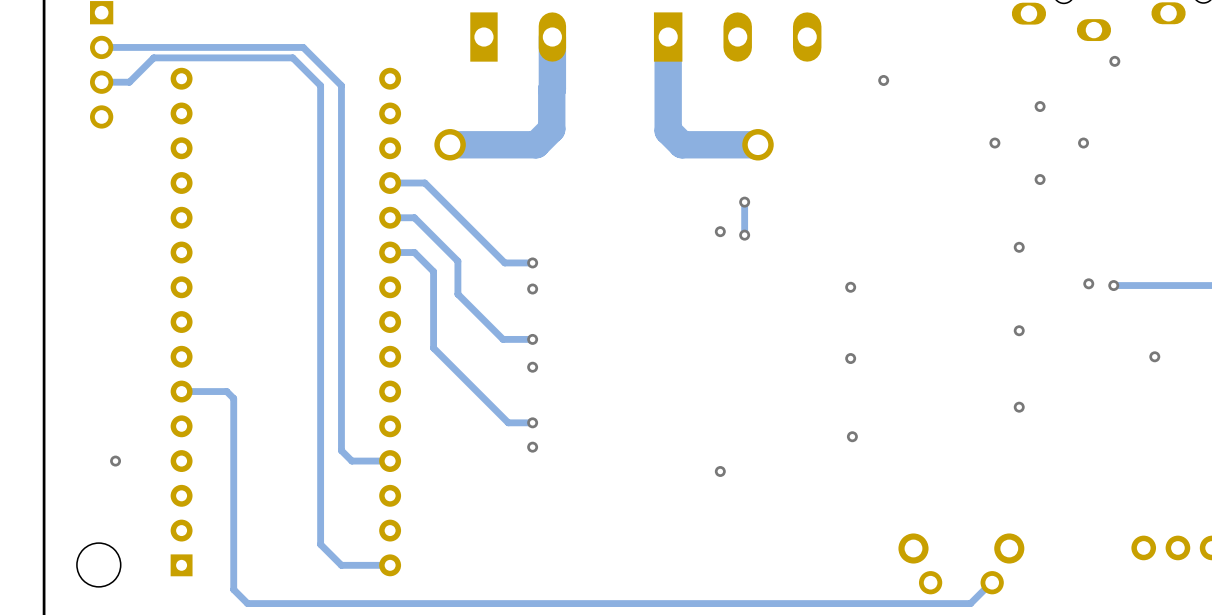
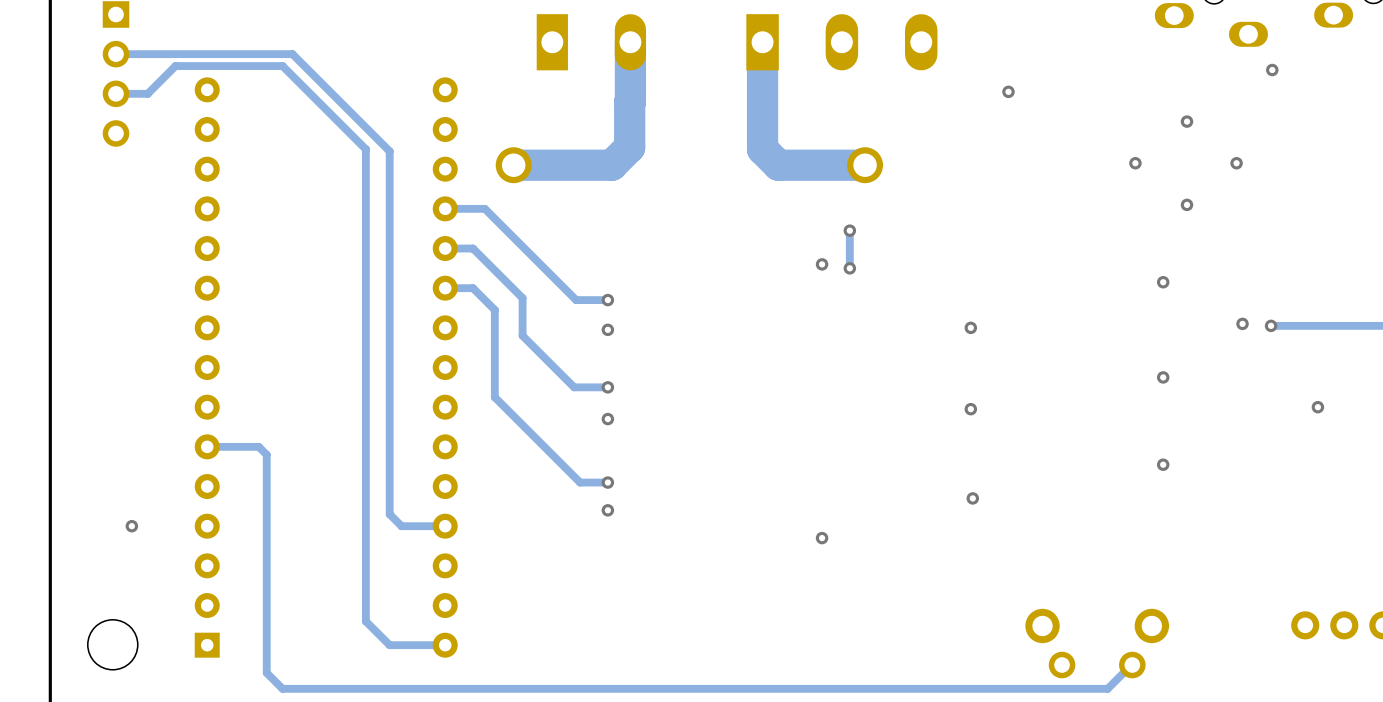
track: (256, 47) (303, 47) (341, 85) (341, 132) -> (292, 54) (389, 151)
track: (247, 57) (292, 57) (320, 85) (320, 130) -> (282, 66) (365, 149)

